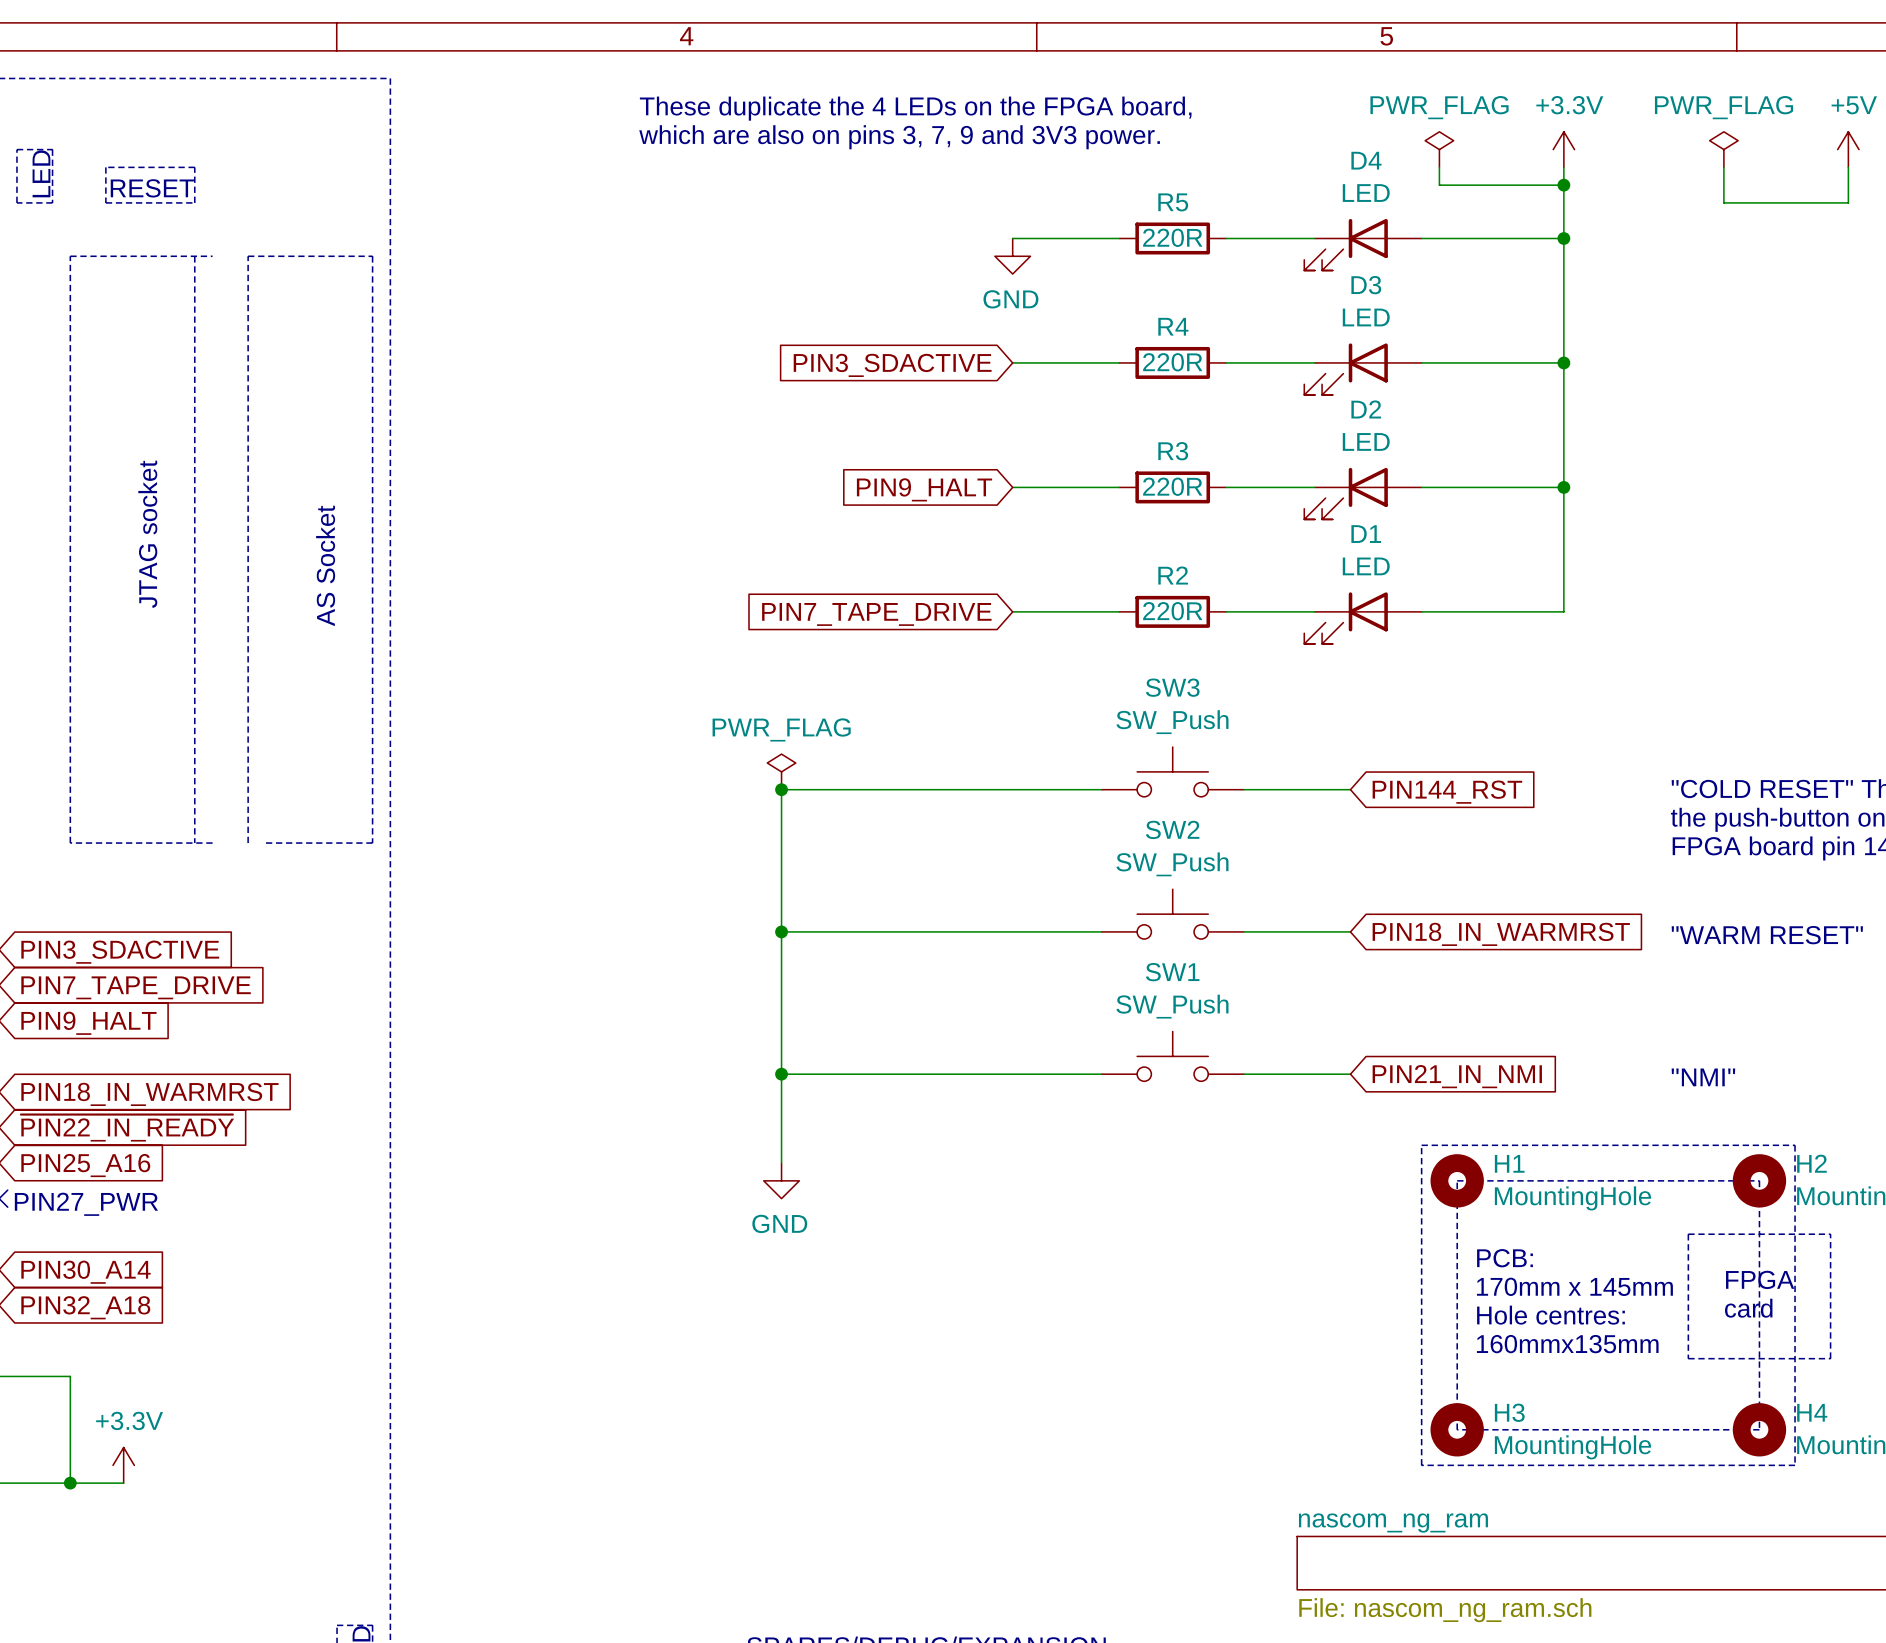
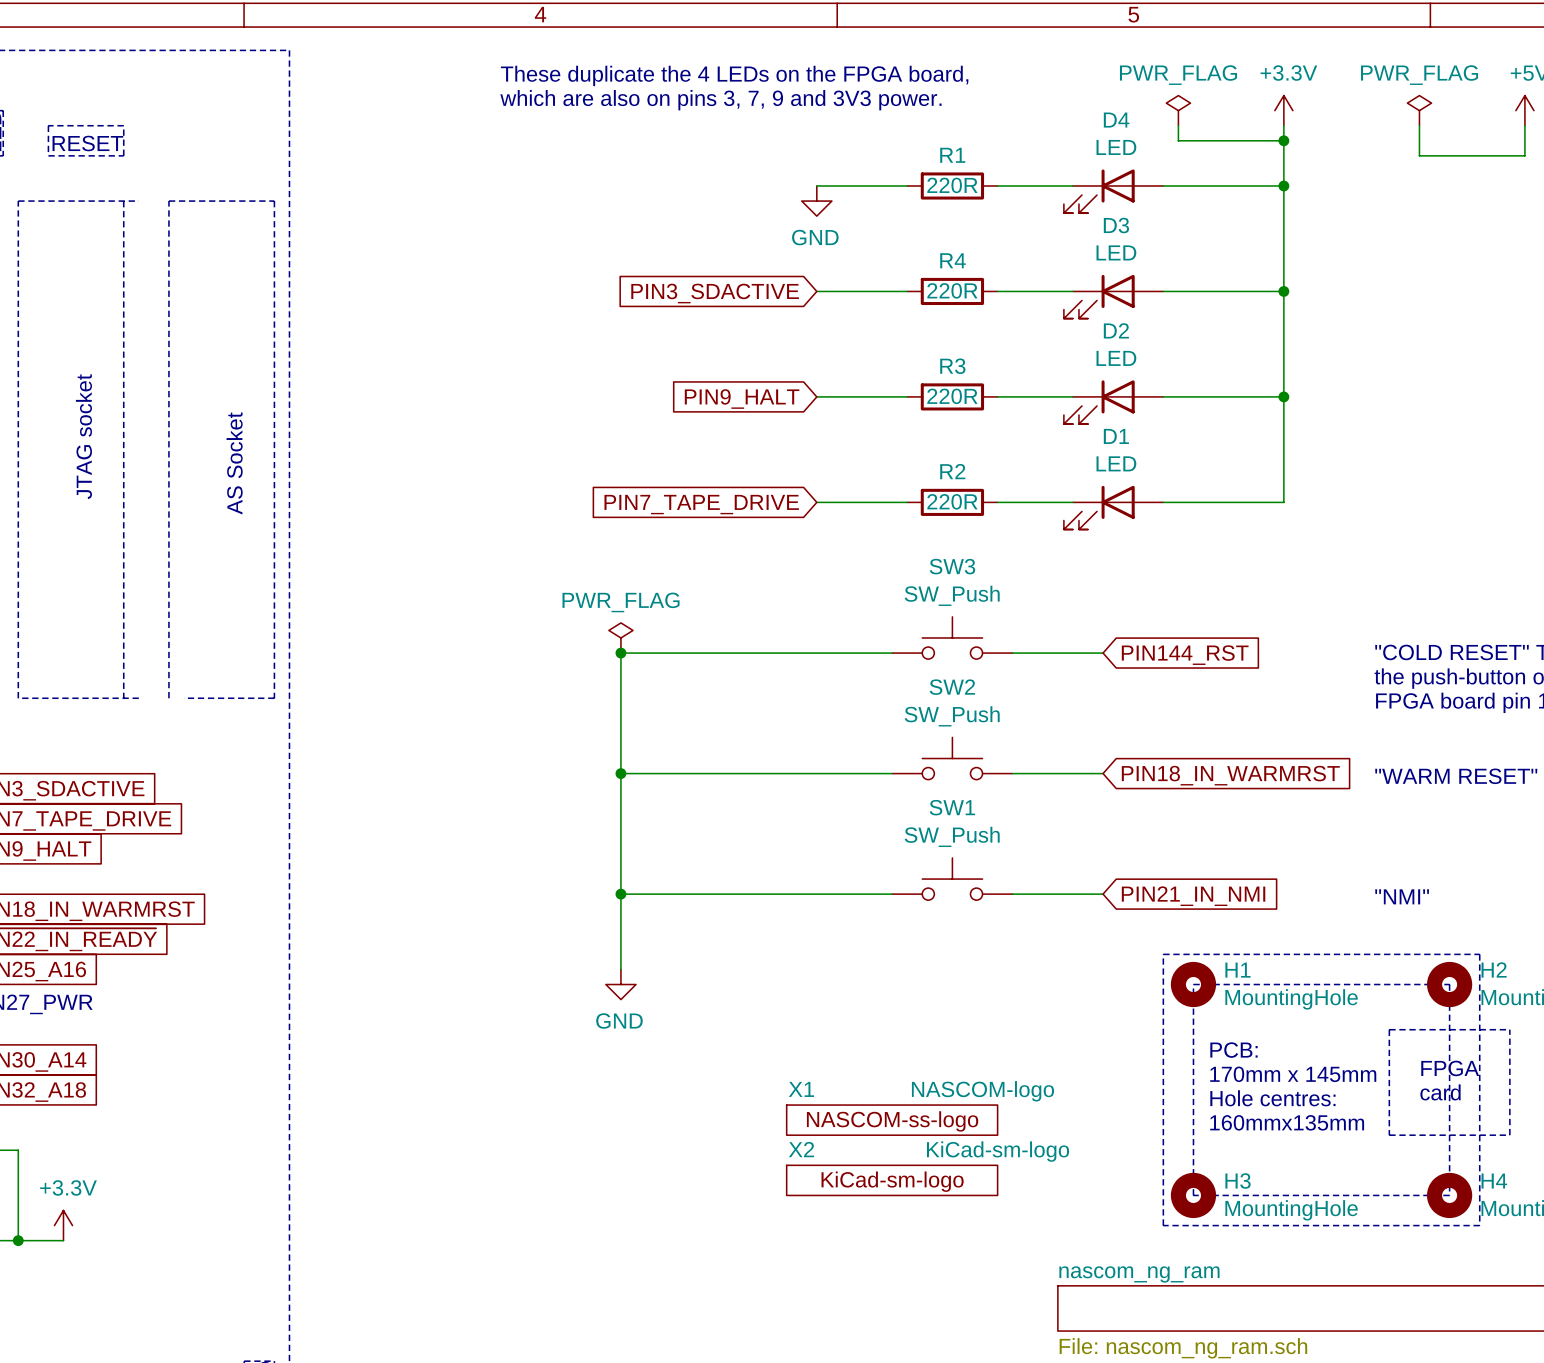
R5 name: R5 (1173, 202) -> R1 (952, 155)
X1: none -> NASCOM-logo (892, 1120)
X2: none -> KiCad-sm-logo (892, 1180)

